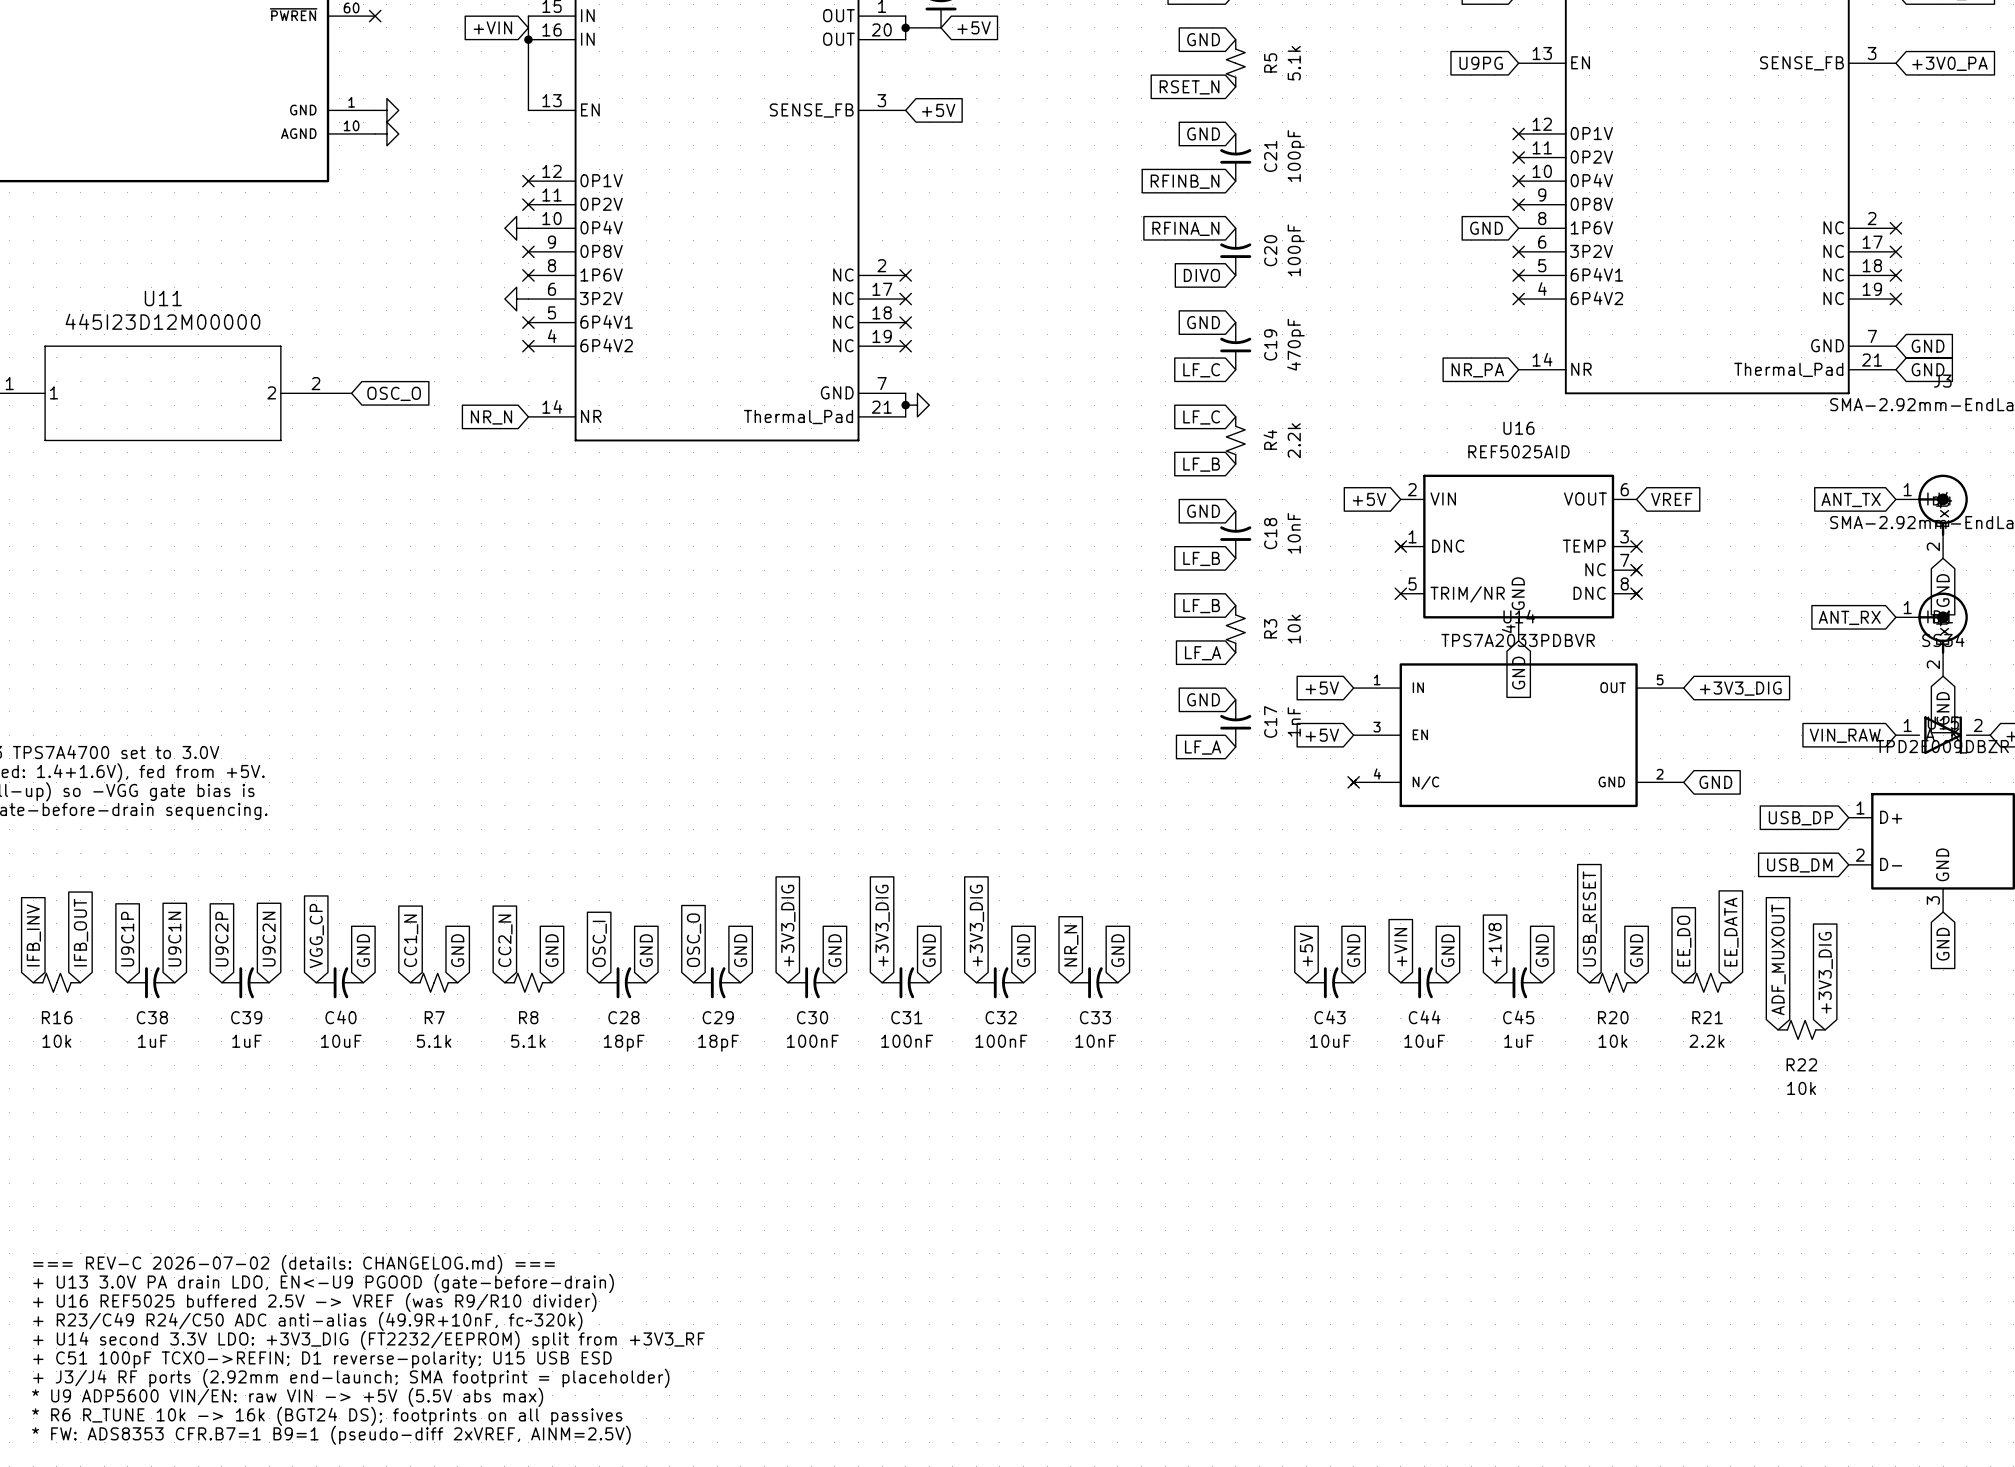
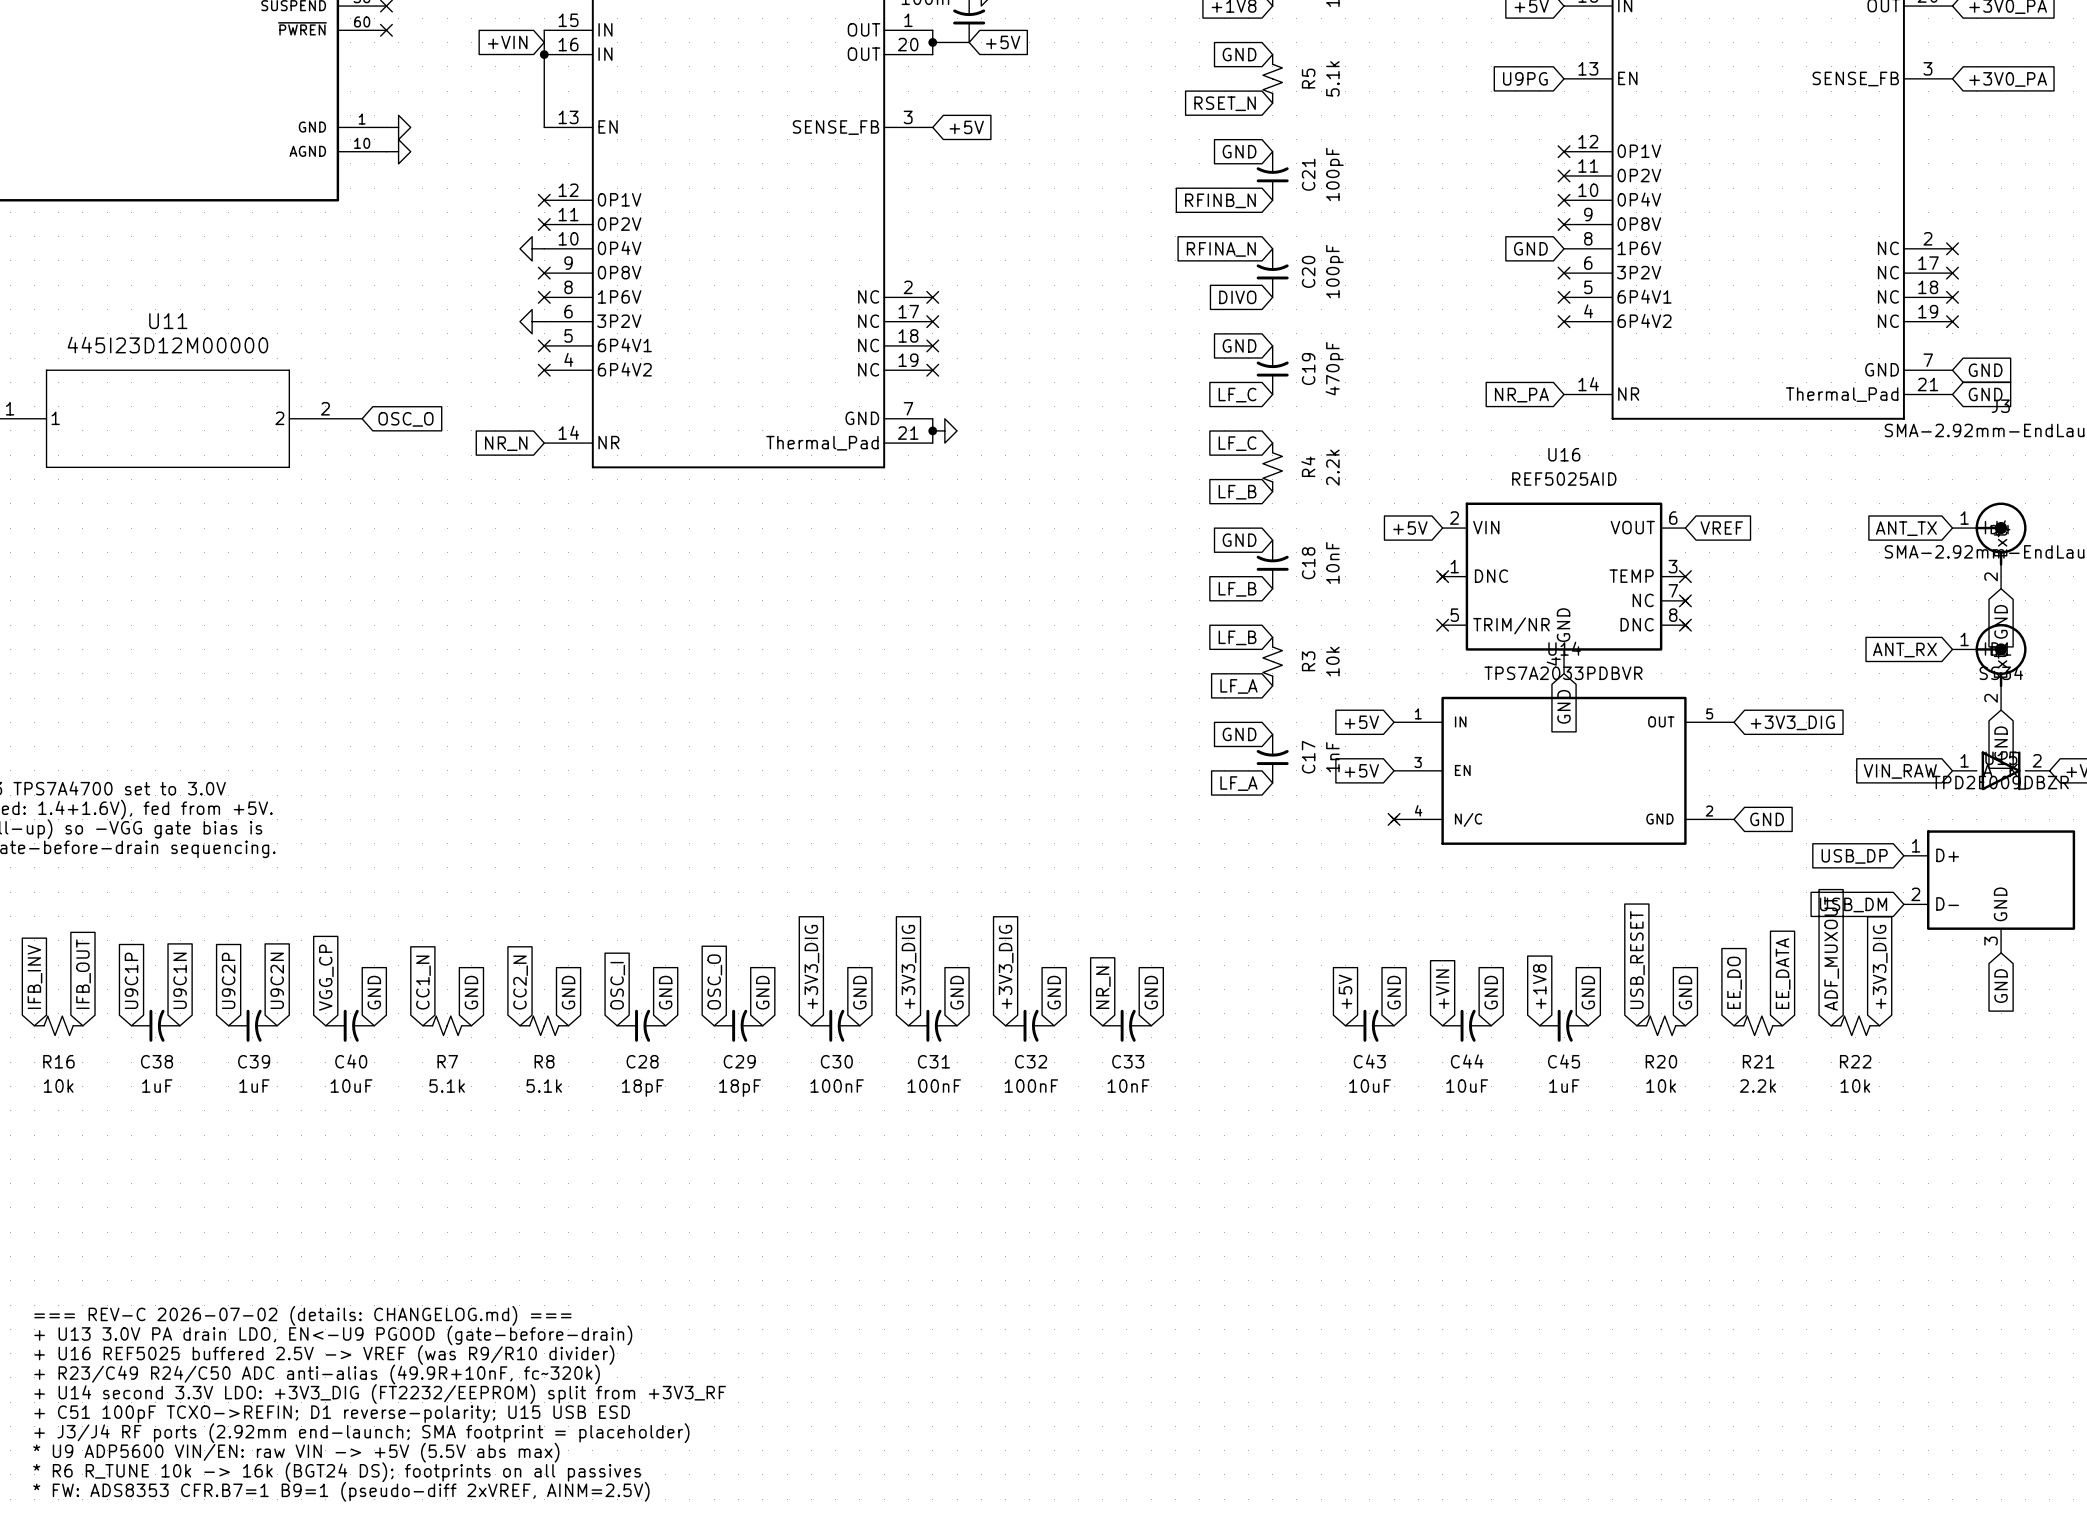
global label position: ADF_MUXOUT (1778, 959) -> ADF_MUXOUT (1831, 953)
global label position: +3V3_DIG (1825, 972) -> +3V3_DIG (1880, 966)
R22 position: (1801, 1029) -> (1855, 1025)

